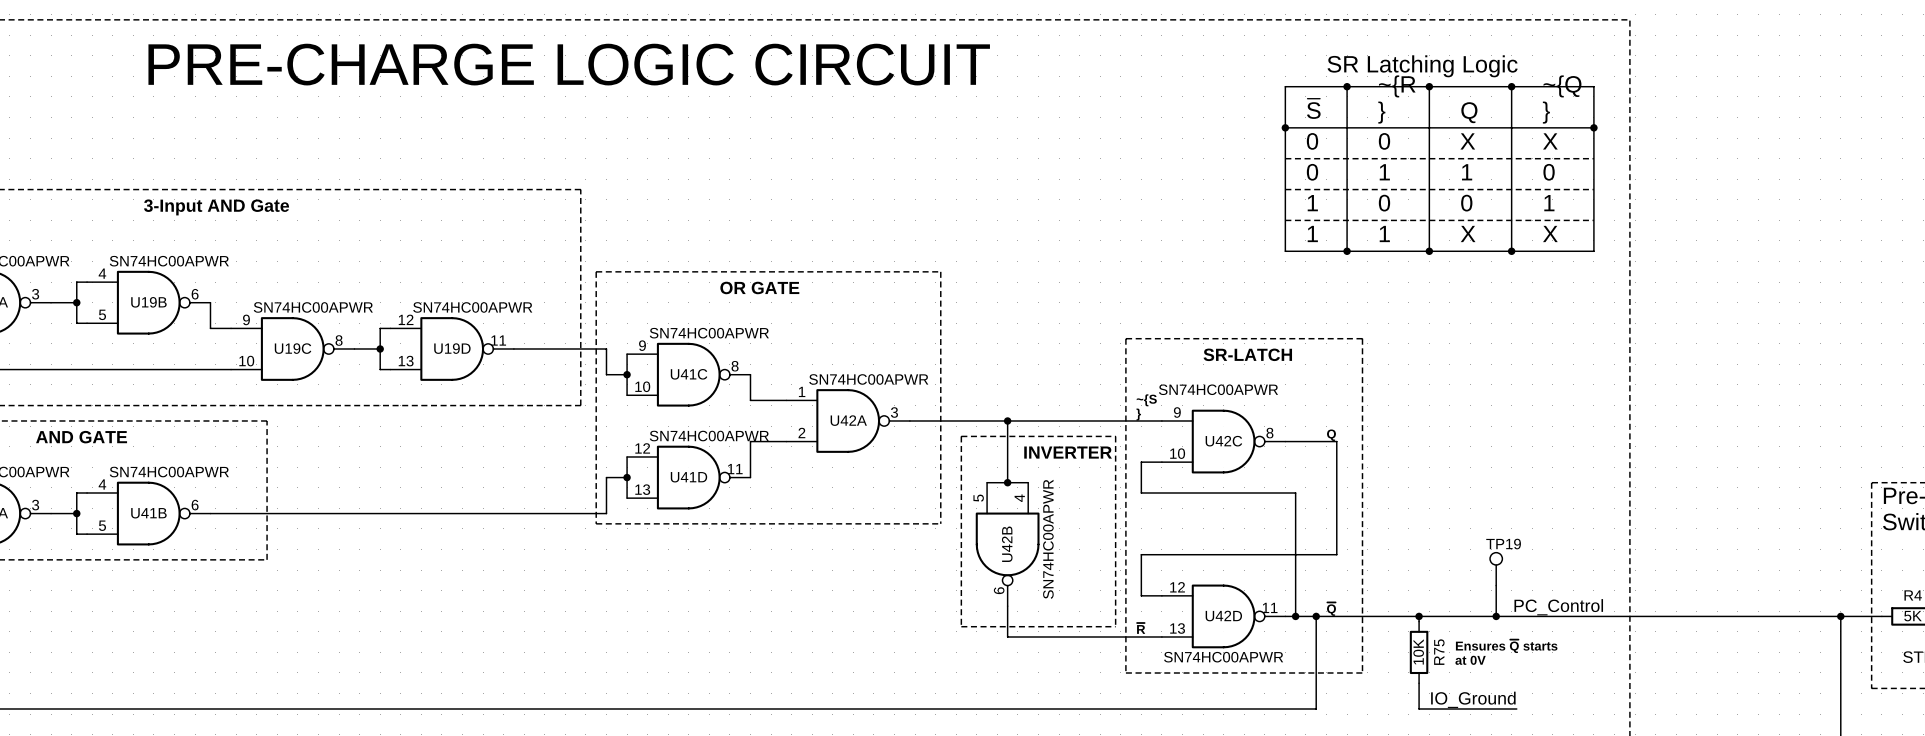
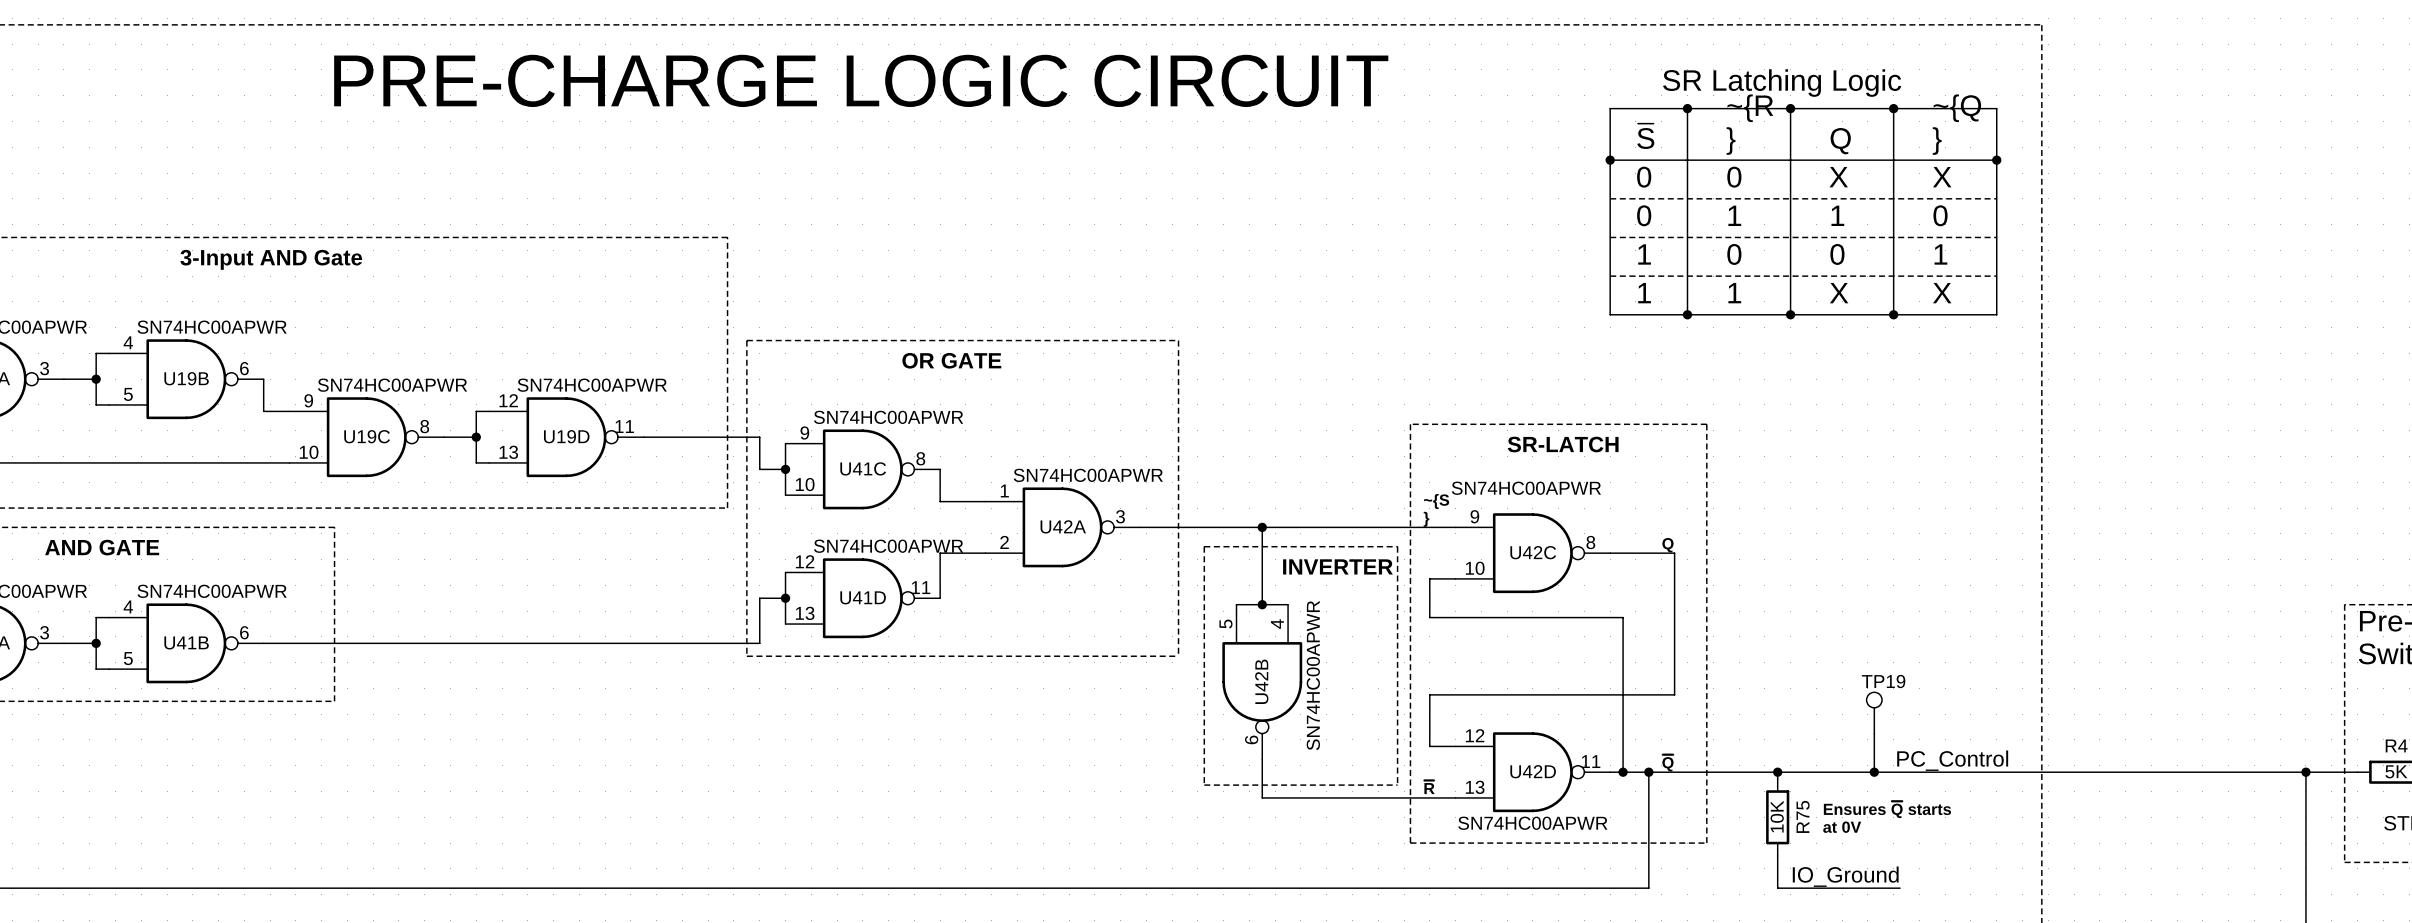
text position: PRE-CHARGE LOGIC CIRCUIT (569, 64) -> PRE-CHARGE LOGIC CIRCUIT (861, 80)

